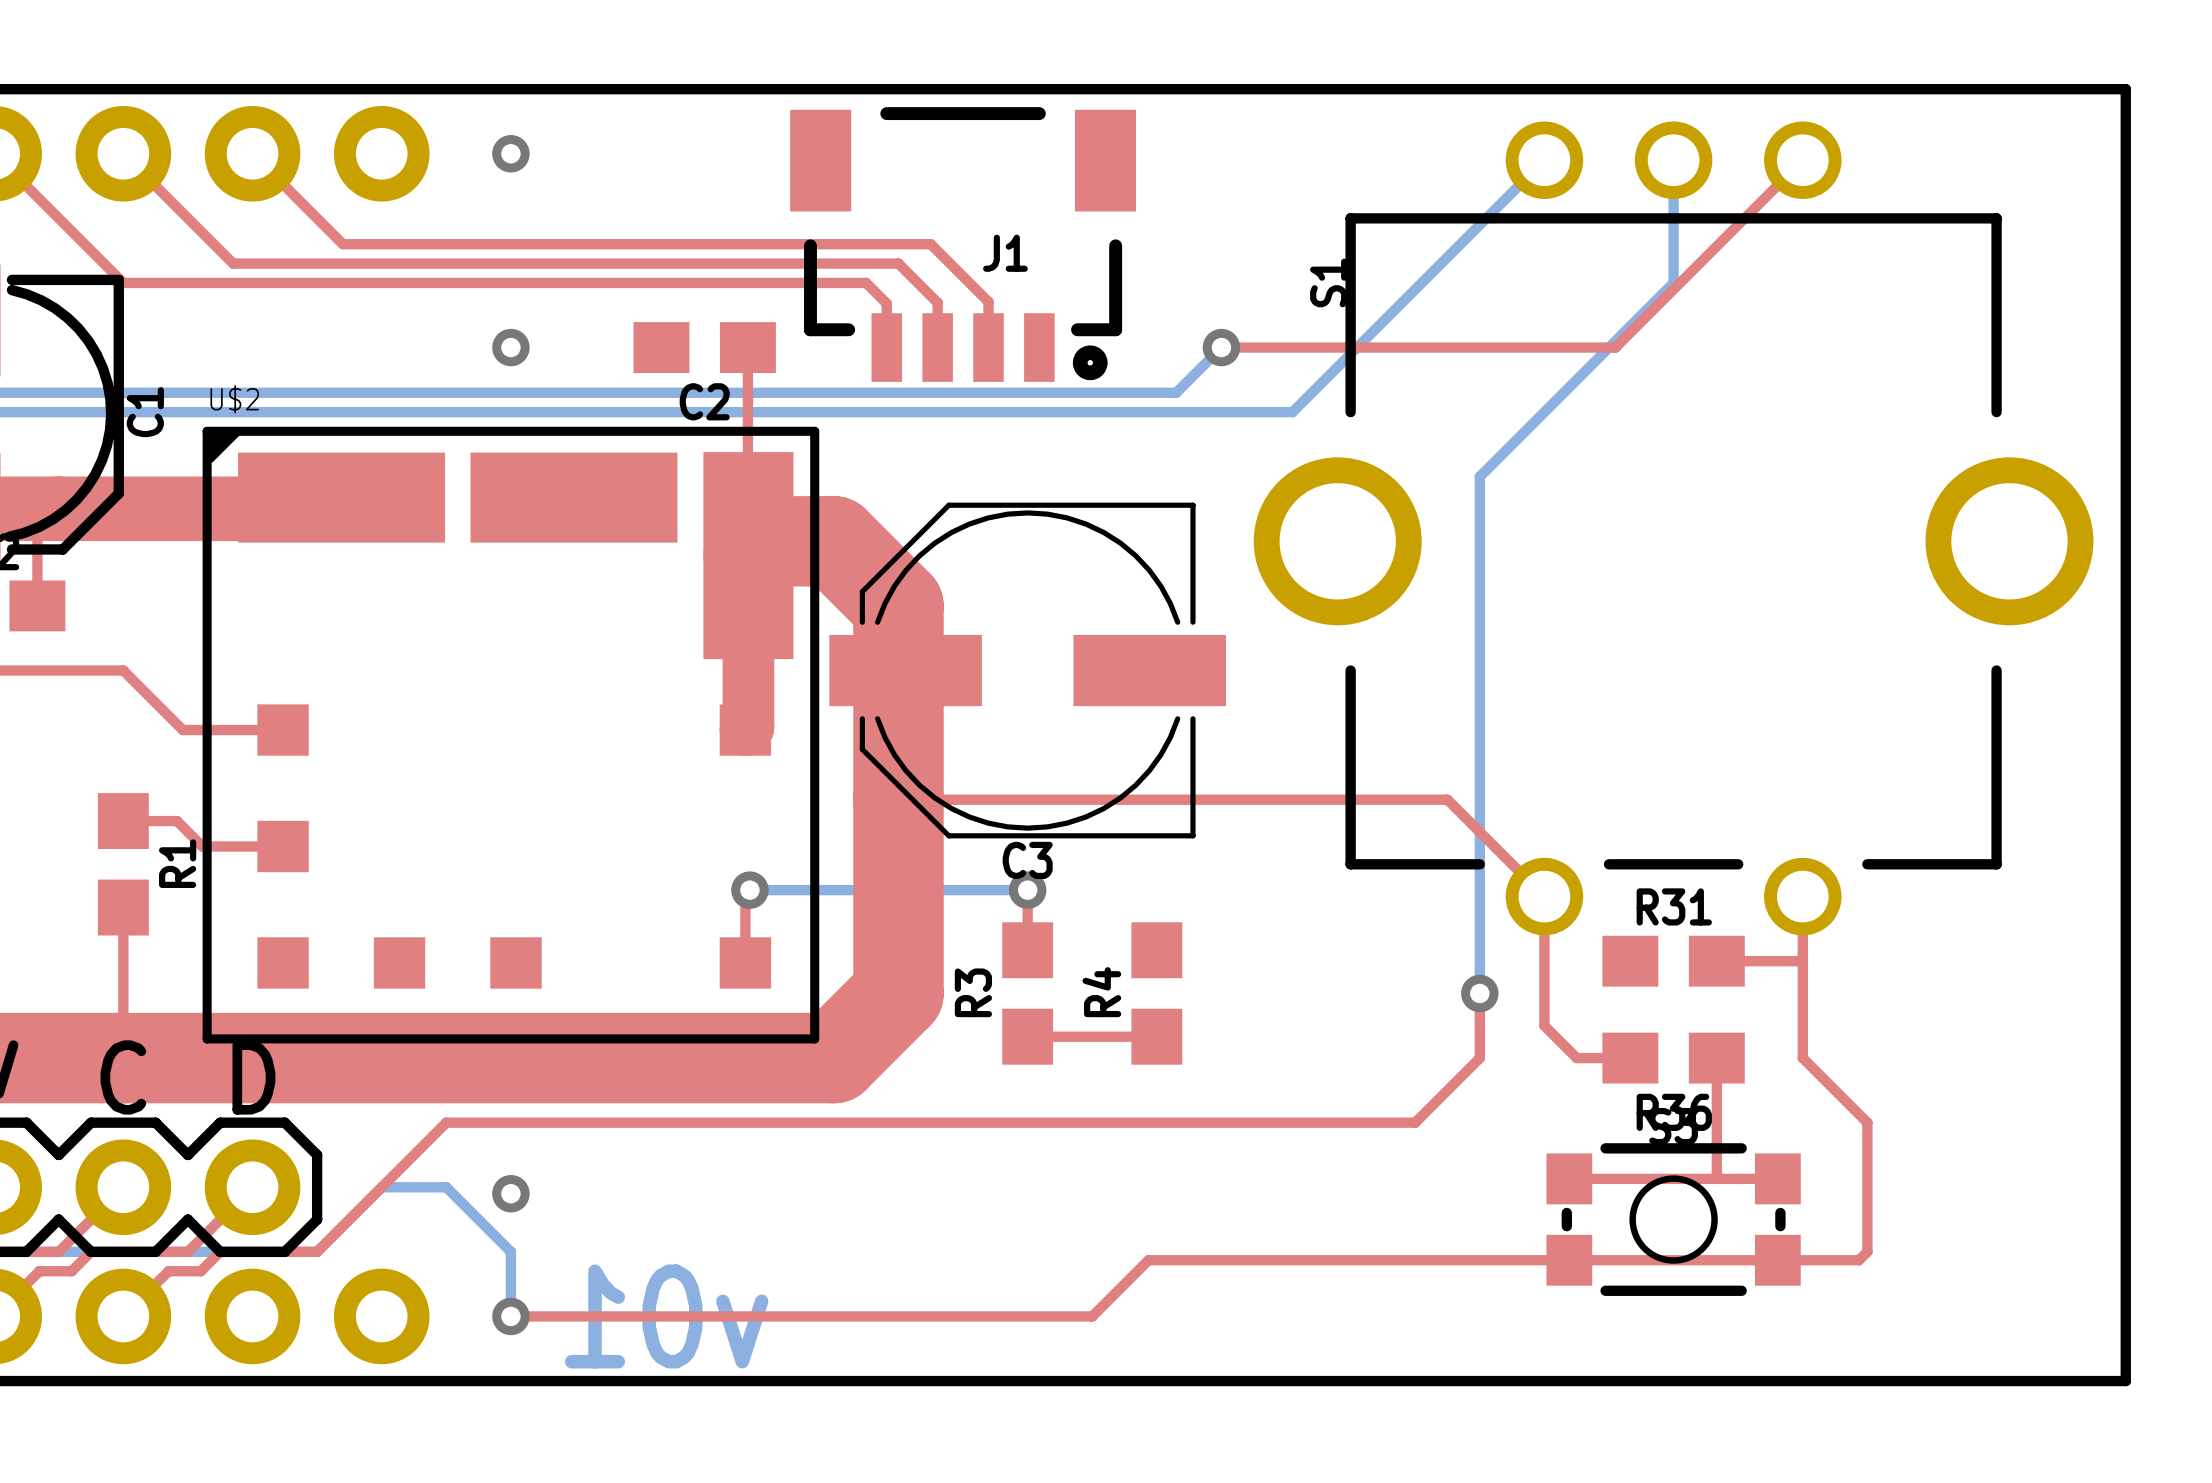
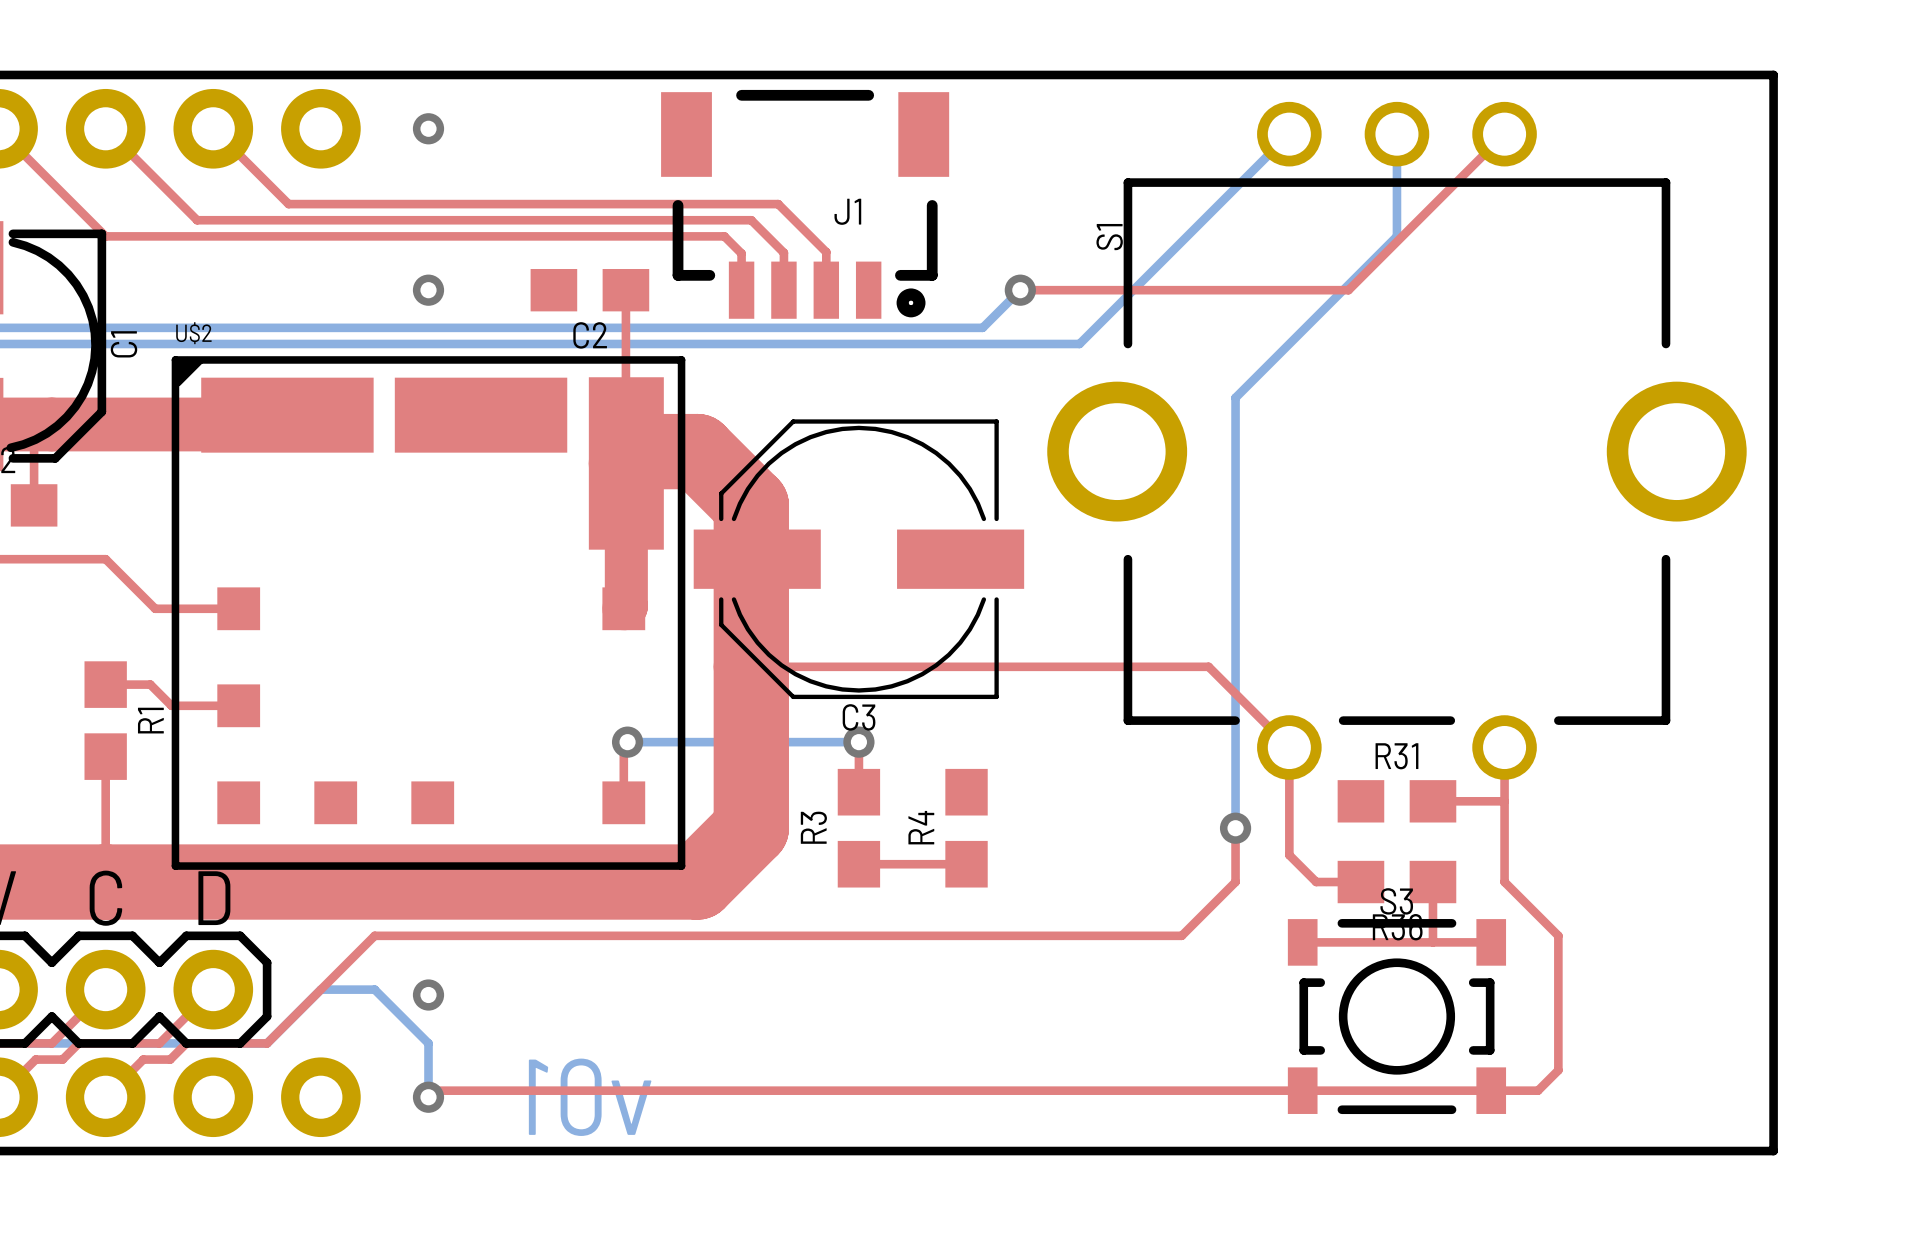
top track: none -> (1302, 942) (1491, 942)
top track: (1716, 1130) (1716, 1178) -> none
S3 footprint: [1546, 1143, 1801, 1296] -> [1287, 919, 1507, 1115]
top track: (1569, 1178) (1777, 1178) -> none
top track: (1867, 1251) (1858, 1260) (1148, 1260) (1092, 1316) (510, 1316) -> (1558, 1043) (1558, 1070) (1538, 1090) (435, 1090)

